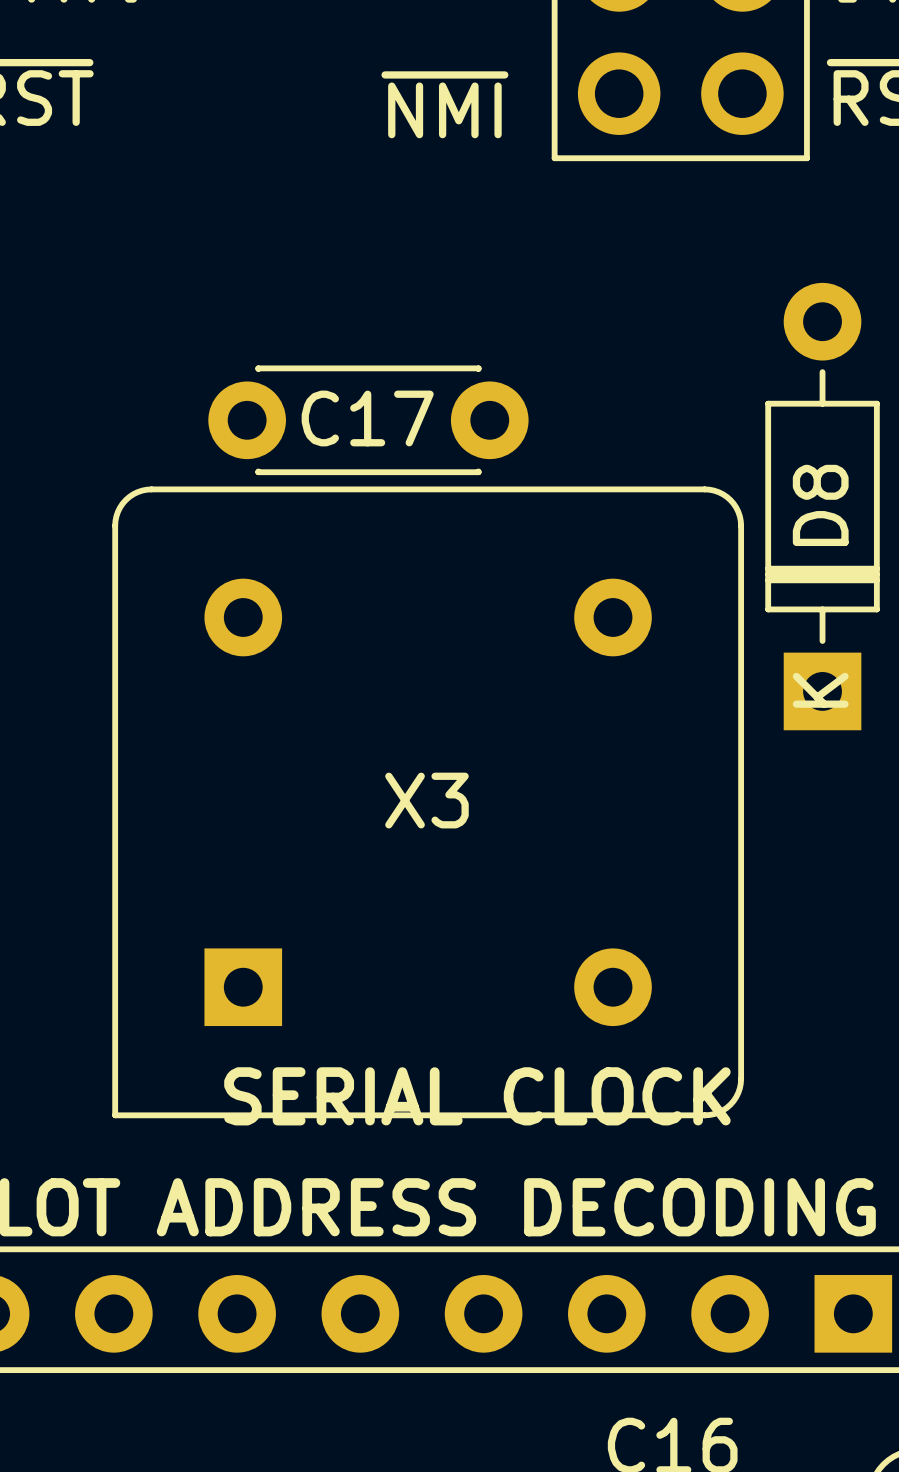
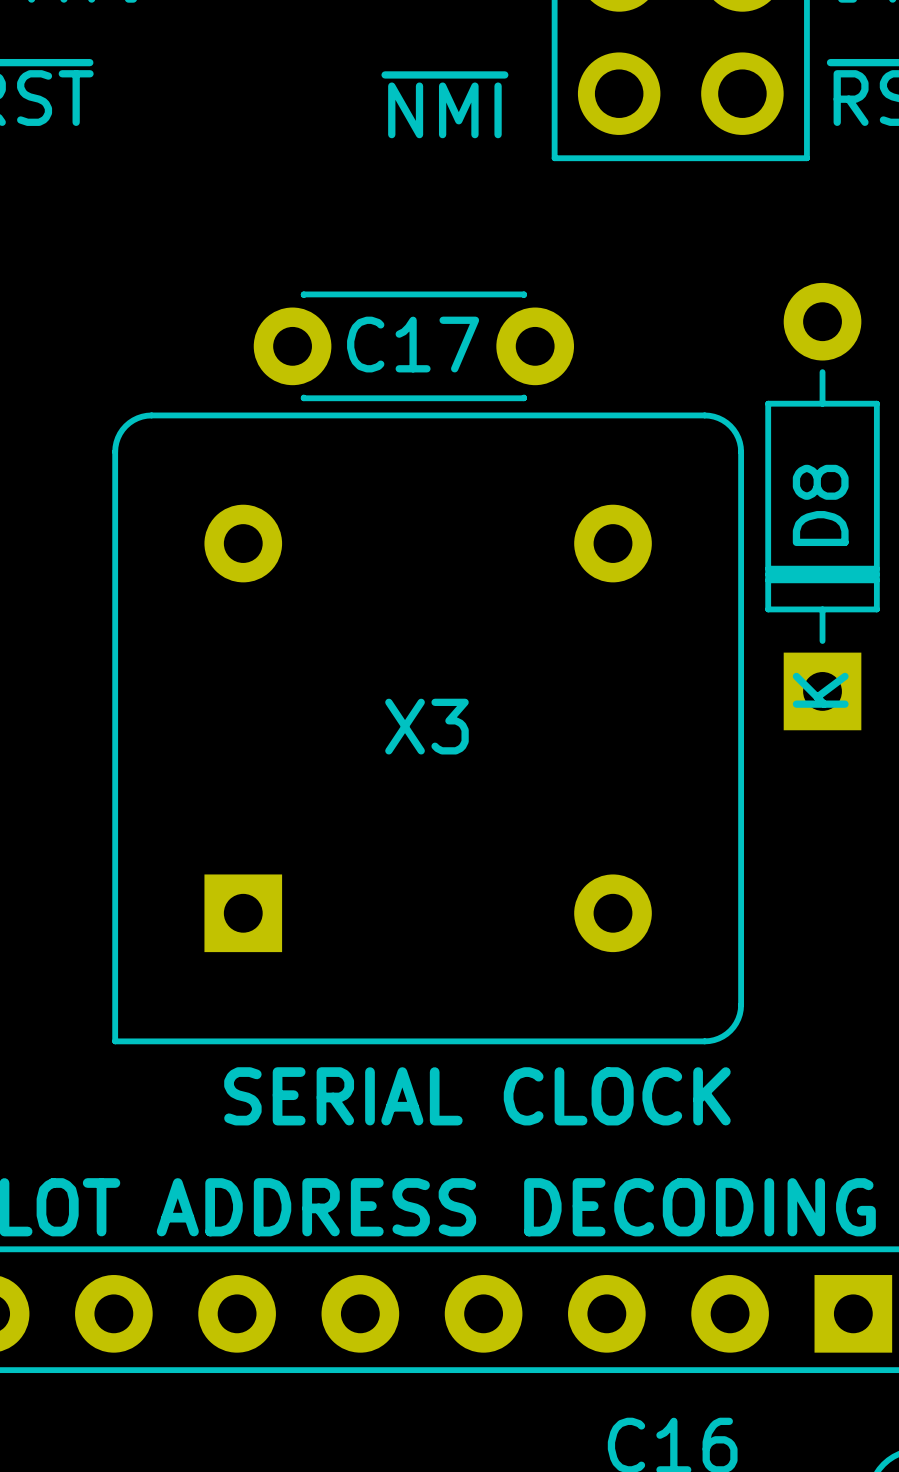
C17 position: (368, 420) -> (413, 346)
X3 position: (428, 802) -> (428, 728)

